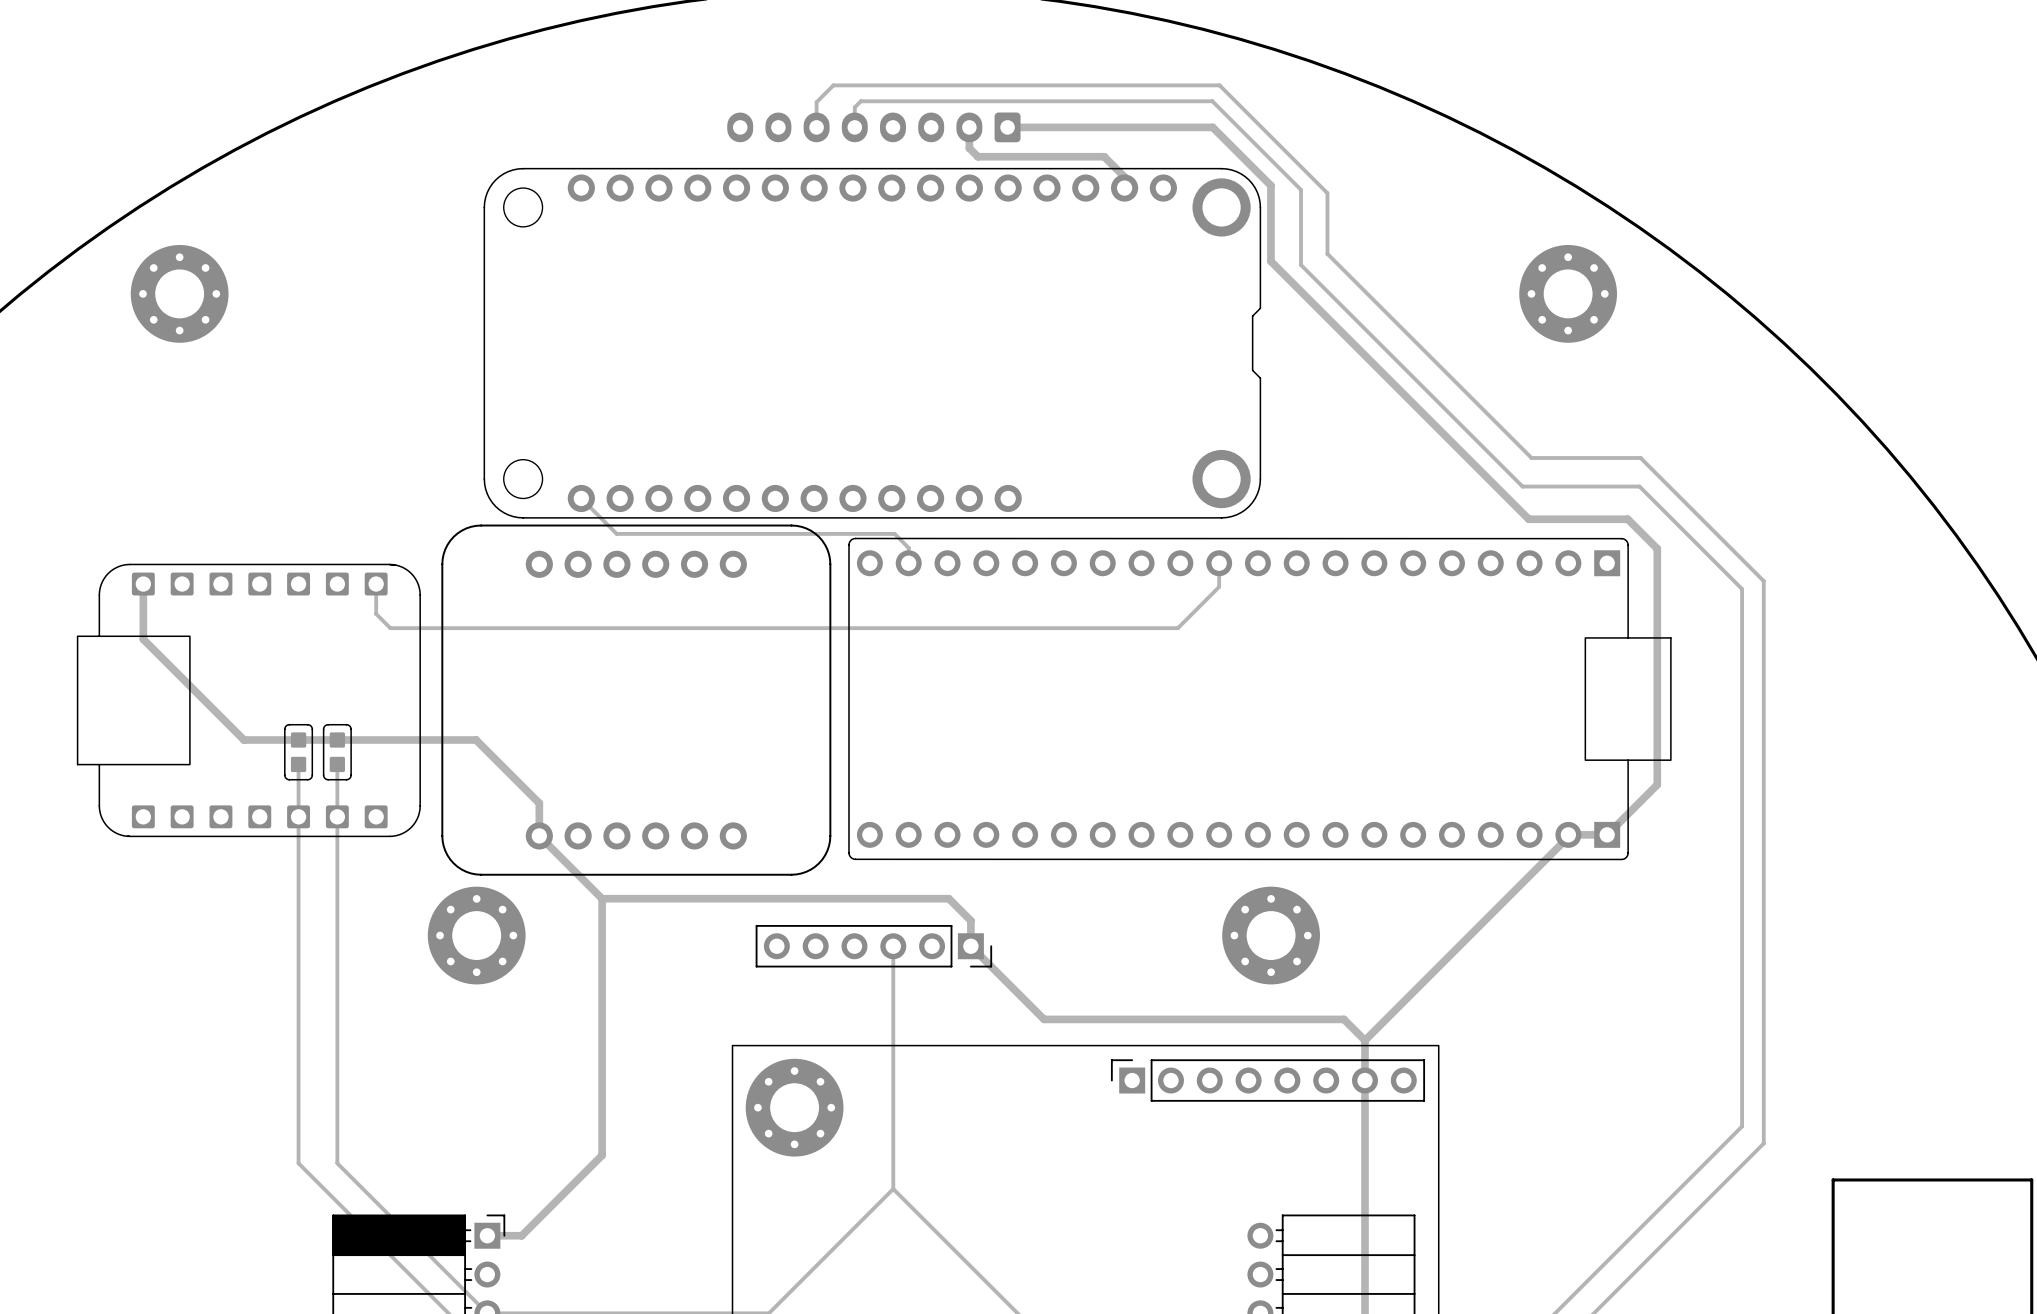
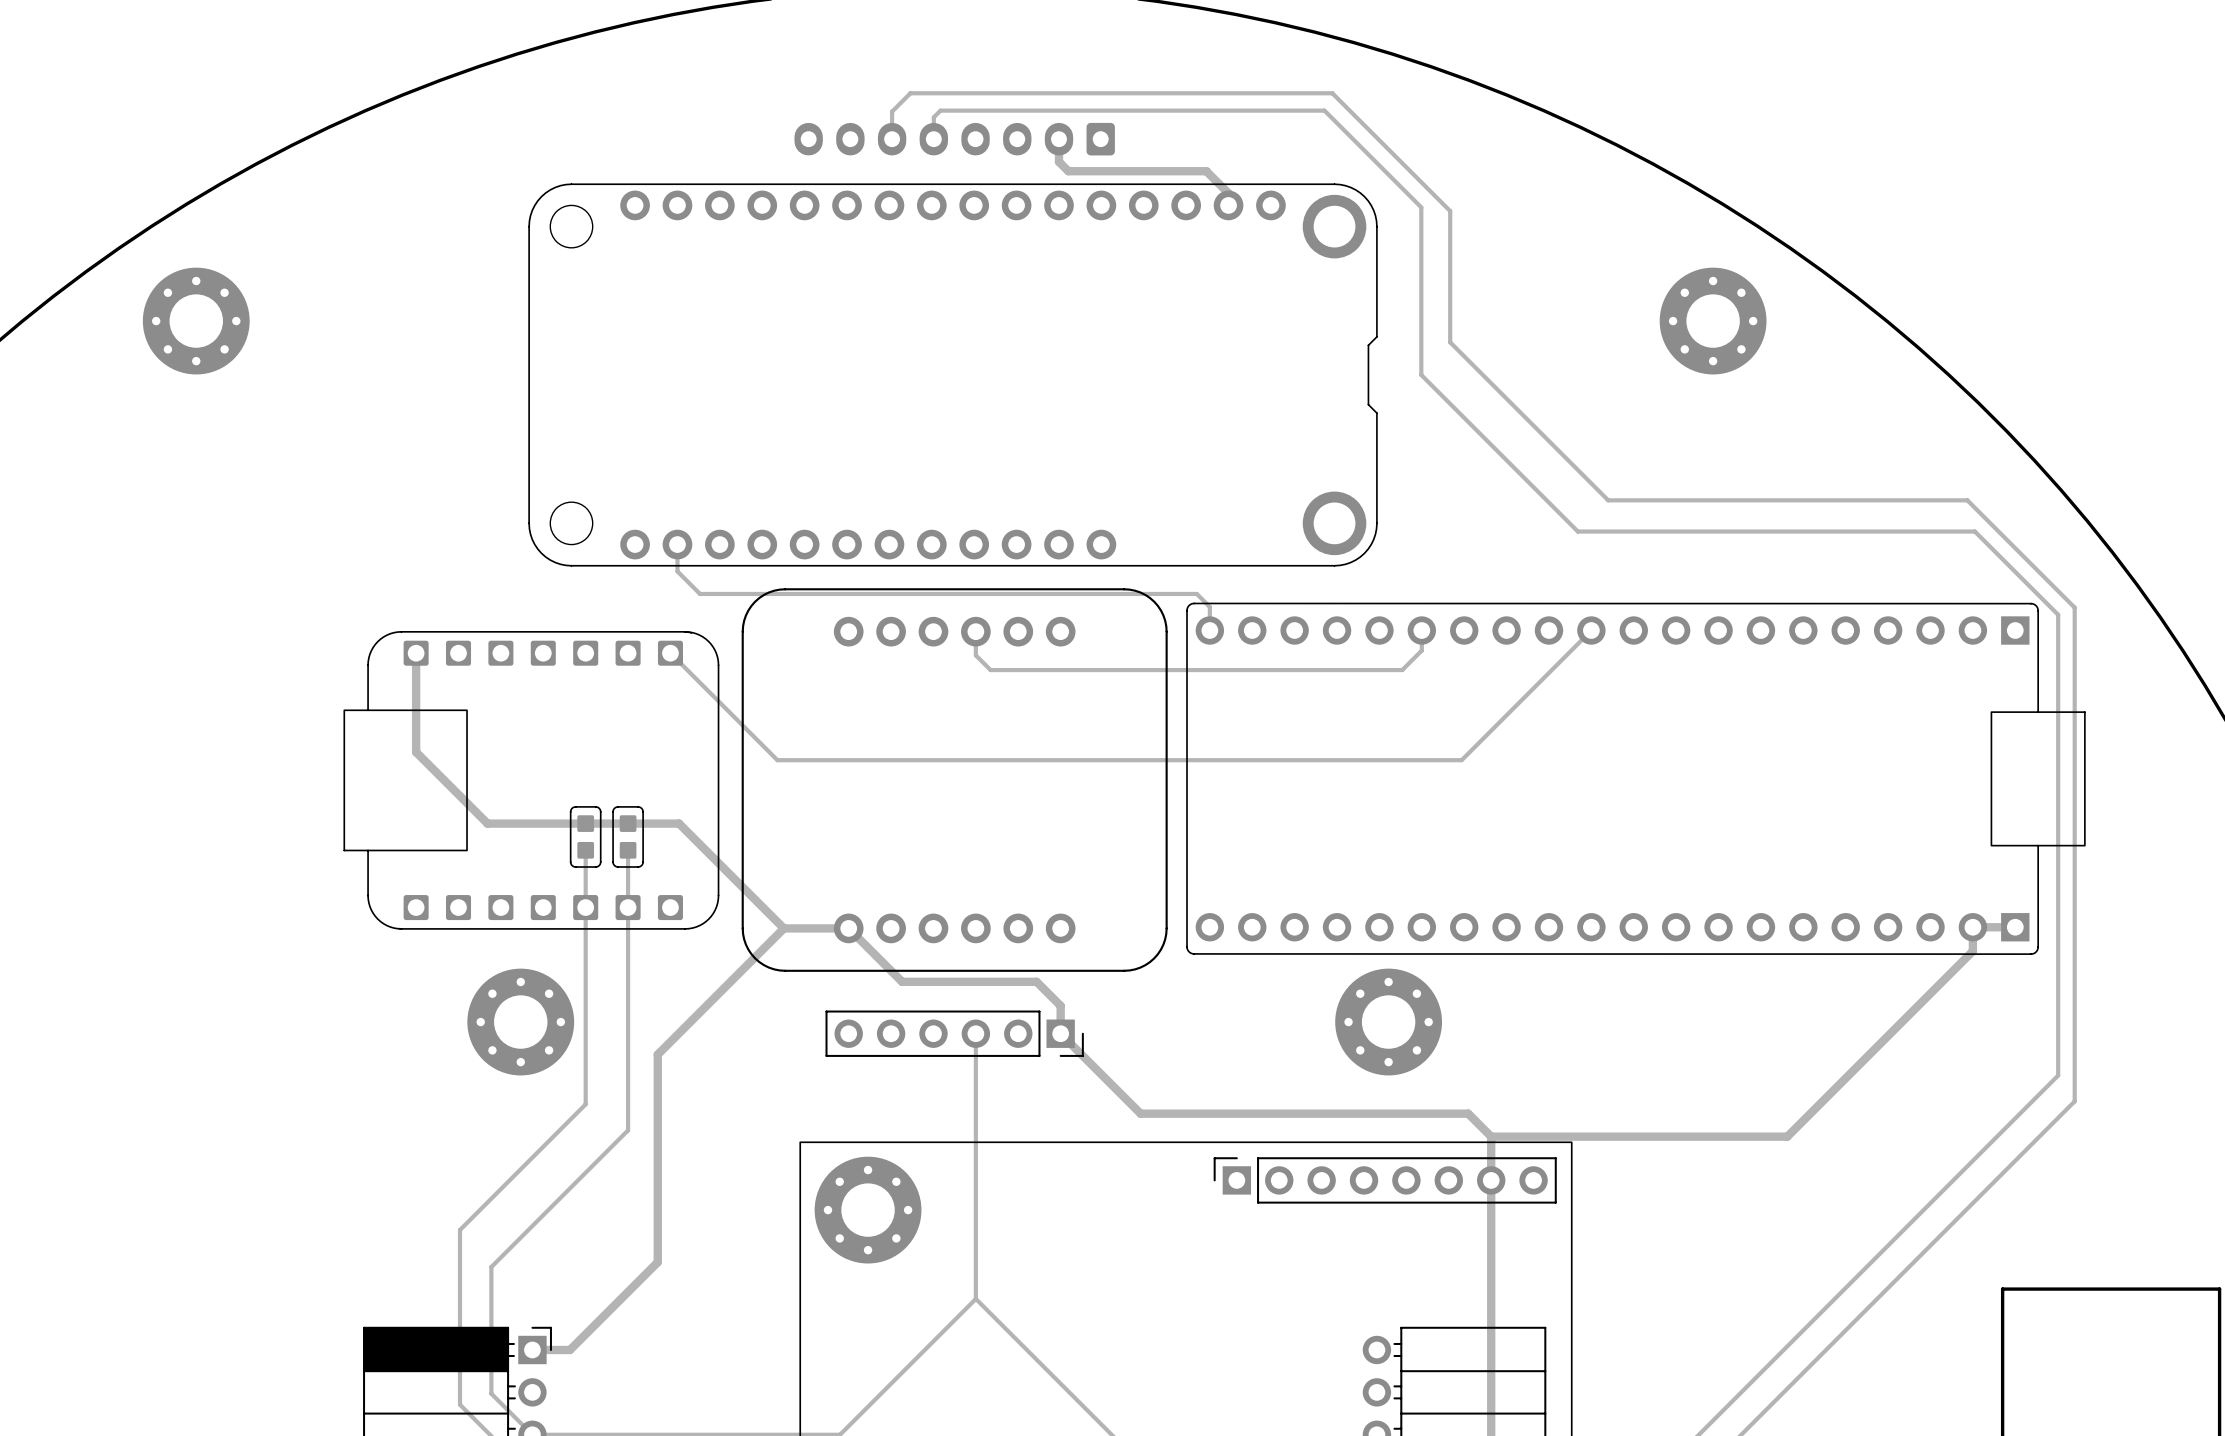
track: (1007, 127) (1212, 127) (1270, 185) (1270, 261) (1528, 519) (1627, 519) (1657, 548) (1657, 784) (1607, 834) (1570, 834) (1365, 1040) -> (2015, 927) (1972, 927) (1972, 951) (1787, 1136) (1491, 1136)
track: (1327, 253) (1531, 457) -> (1450, 277) (1450, 342) (1608, 500) (1673, 500)
track: (1301, 265) (1522, 486) -> (1421, 289) (1421, 374) (1577, 531) (1663, 531)
track: (1640, 457) (1763, 581) (1763, 1143) -> (1792, 500) (1967, 500) (2074, 607) (2074, 1101) (1926, 1249)
track: (1639, 486) (1742, 589) (1742, 1126) -> (1791, 531) (1974, 531) (2058, 614) (2058, 1075) (1903, 1230)
track: (581, 498) (616, 533) (894, 533) (908, 547) (908, 563) -> none
track: none -> (677, 544) (677, 571) (700, 593) (1196, 593) (1209, 606) (1209, 630)
track: (1219, 563) (1219, 586) (1177, 628) (390, 628) (376, 613) (376, 584) -> none
track: none -> (1421, 630) (1421, 650) (1402, 670) (990, 670) (975, 655) (975, 631)
track: none -> (1591, 630) (1461, 760) (777, 760) (670, 653)
track: (143, 584) (143, 639) (244, 740) (476, 740) (539, 803) (539, 835) (602, 898) -> none
part position: (1259, 698) -> (1635, 778)
part position: (248, 700) -> (531, 780)
part position: (636, 700) -> (954, 780)
part: (298, 752) -> none
part: (337, 752) -> none
track: (298, 764) (298, 1163) (421, 1285) -> (585, 850) (585, 1104) (460, 1229) (460, 1404)
track: (337, 764) (337, 1163) (449, 1275) -> (628, 850) (628, 1130) (491, 1267) (491, 1393)
part: none -> (585, 836)
part: none -> (628, 836)
track: (602, 898) (602, 965) -> (783, 928) (657, 1054)
track: (602, 898) (825, 898) -> (416, 653) (416, 752) (487, 823) (679, 823) (783, 928) (848, 928) (902, 981)

